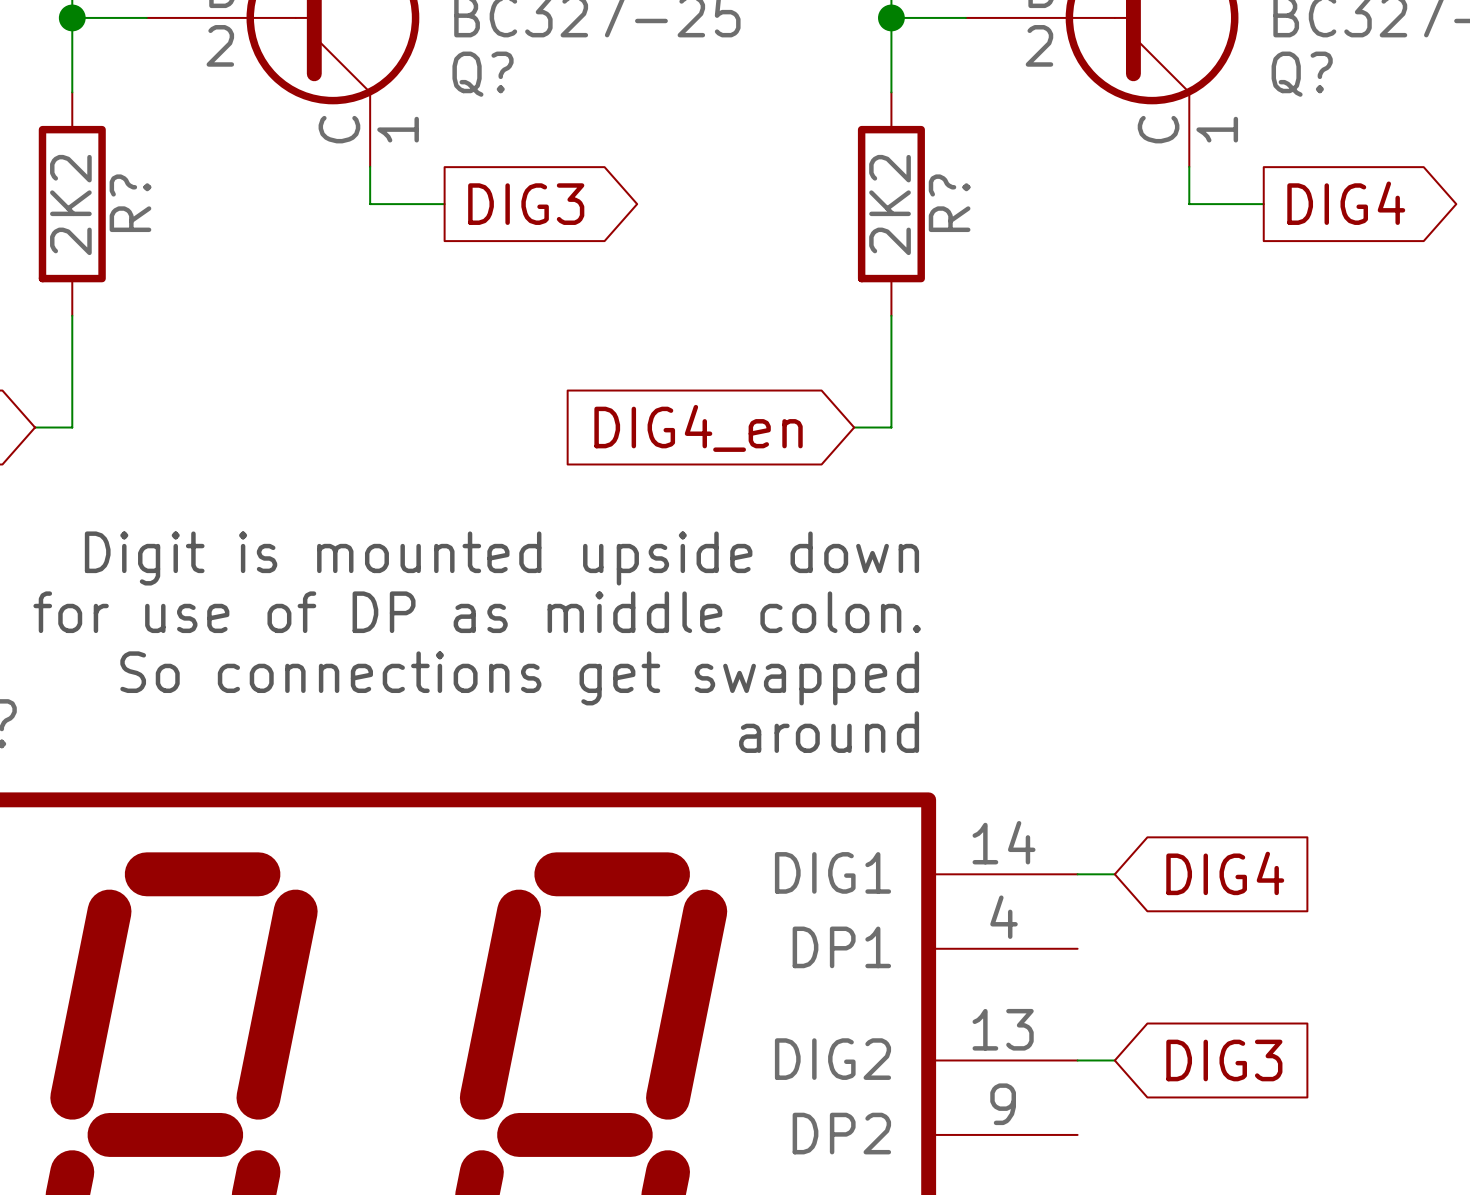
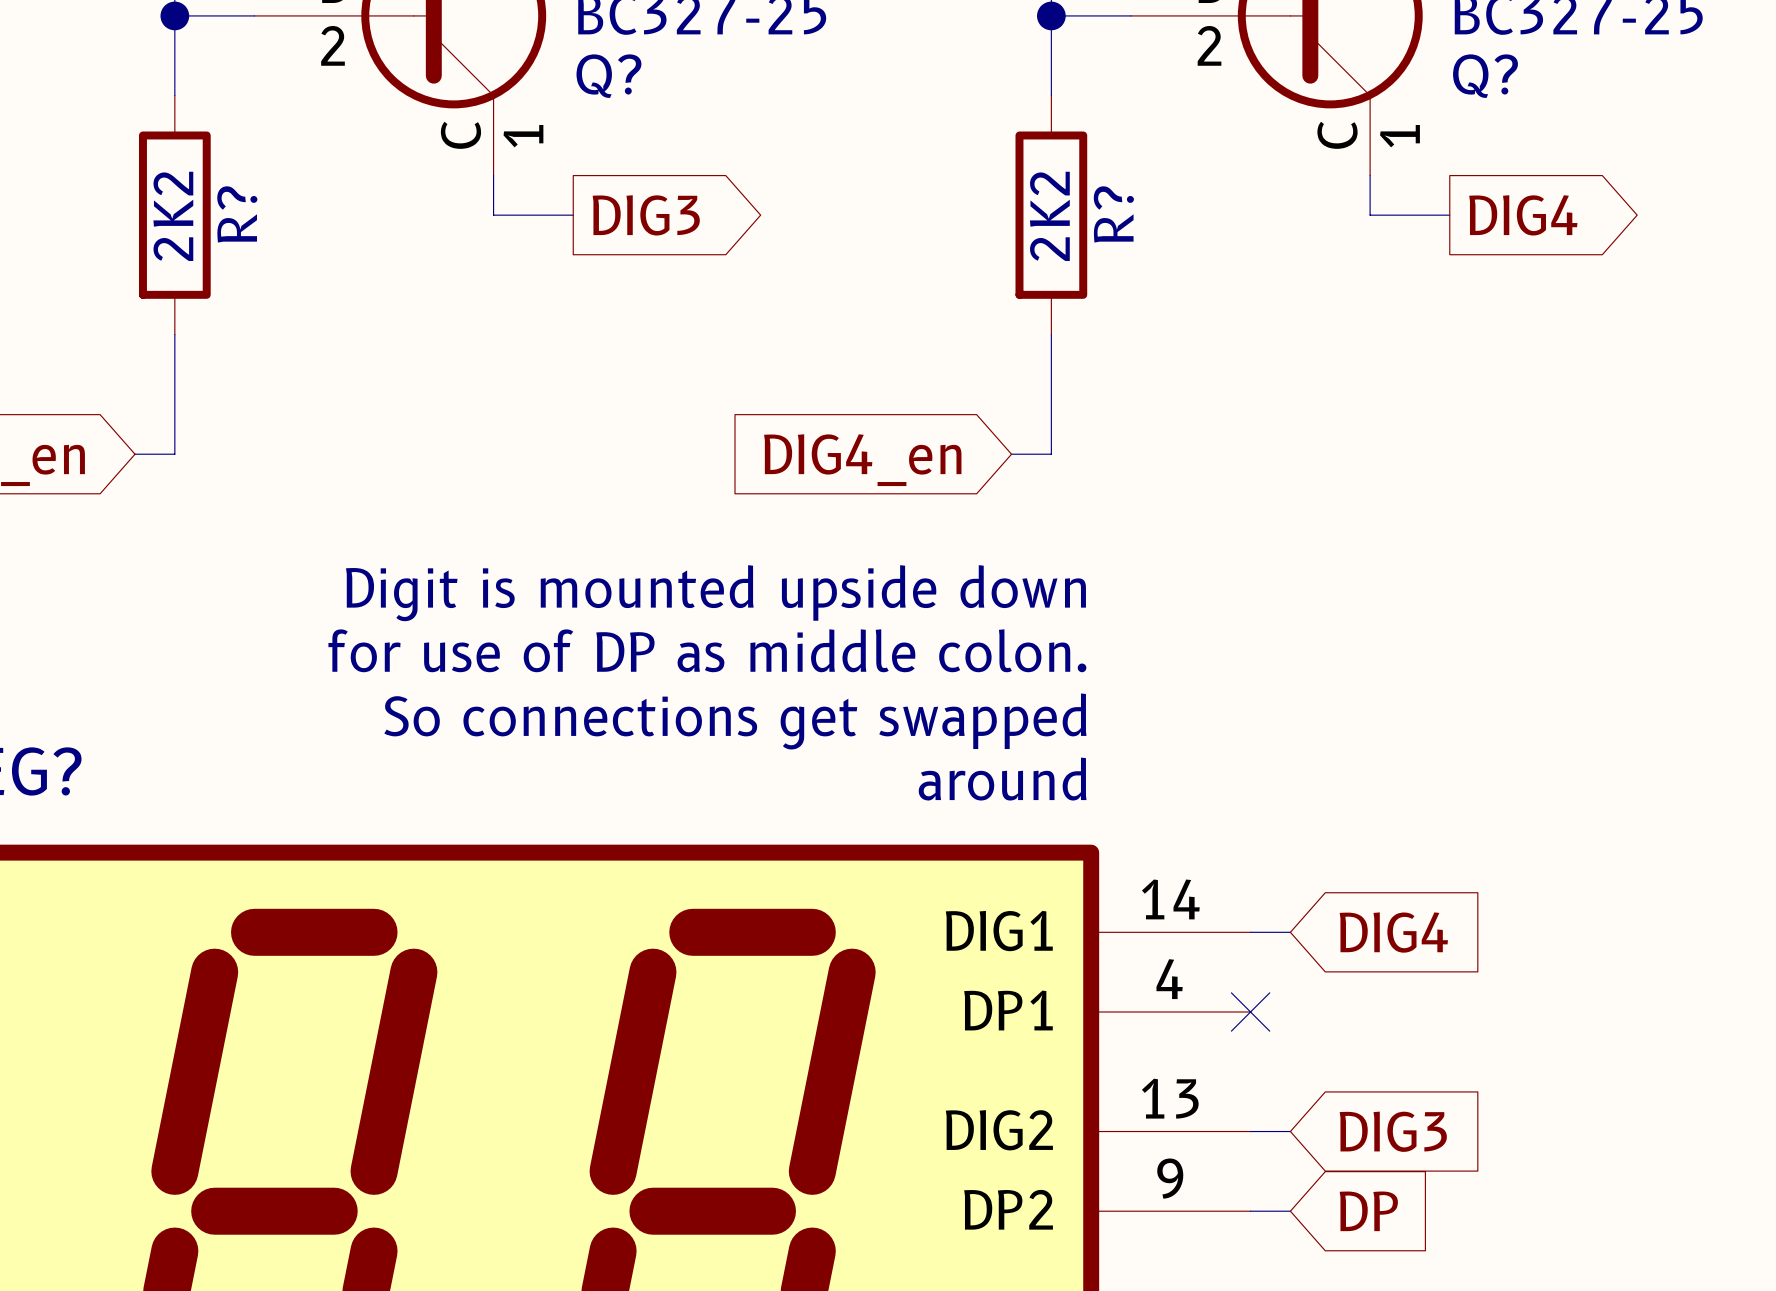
no-connect mark: none -> (1250, 1012)
wire: none -> (1250, 1211) (1290, 1211)
global label: none -> DP (1368, 1211)

